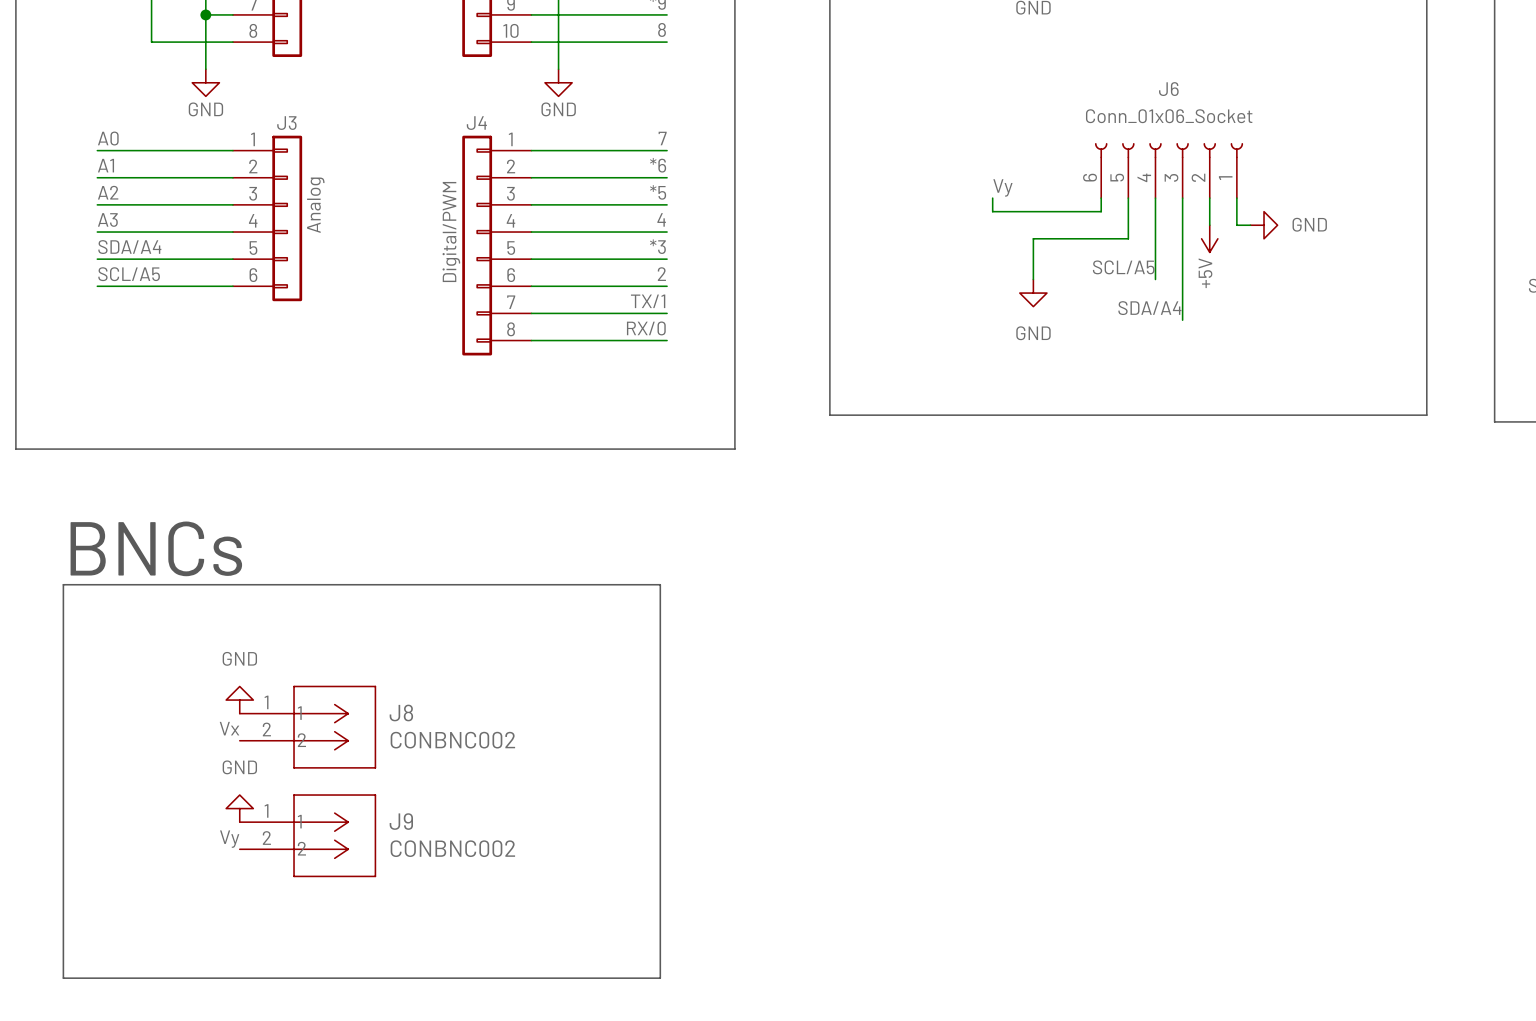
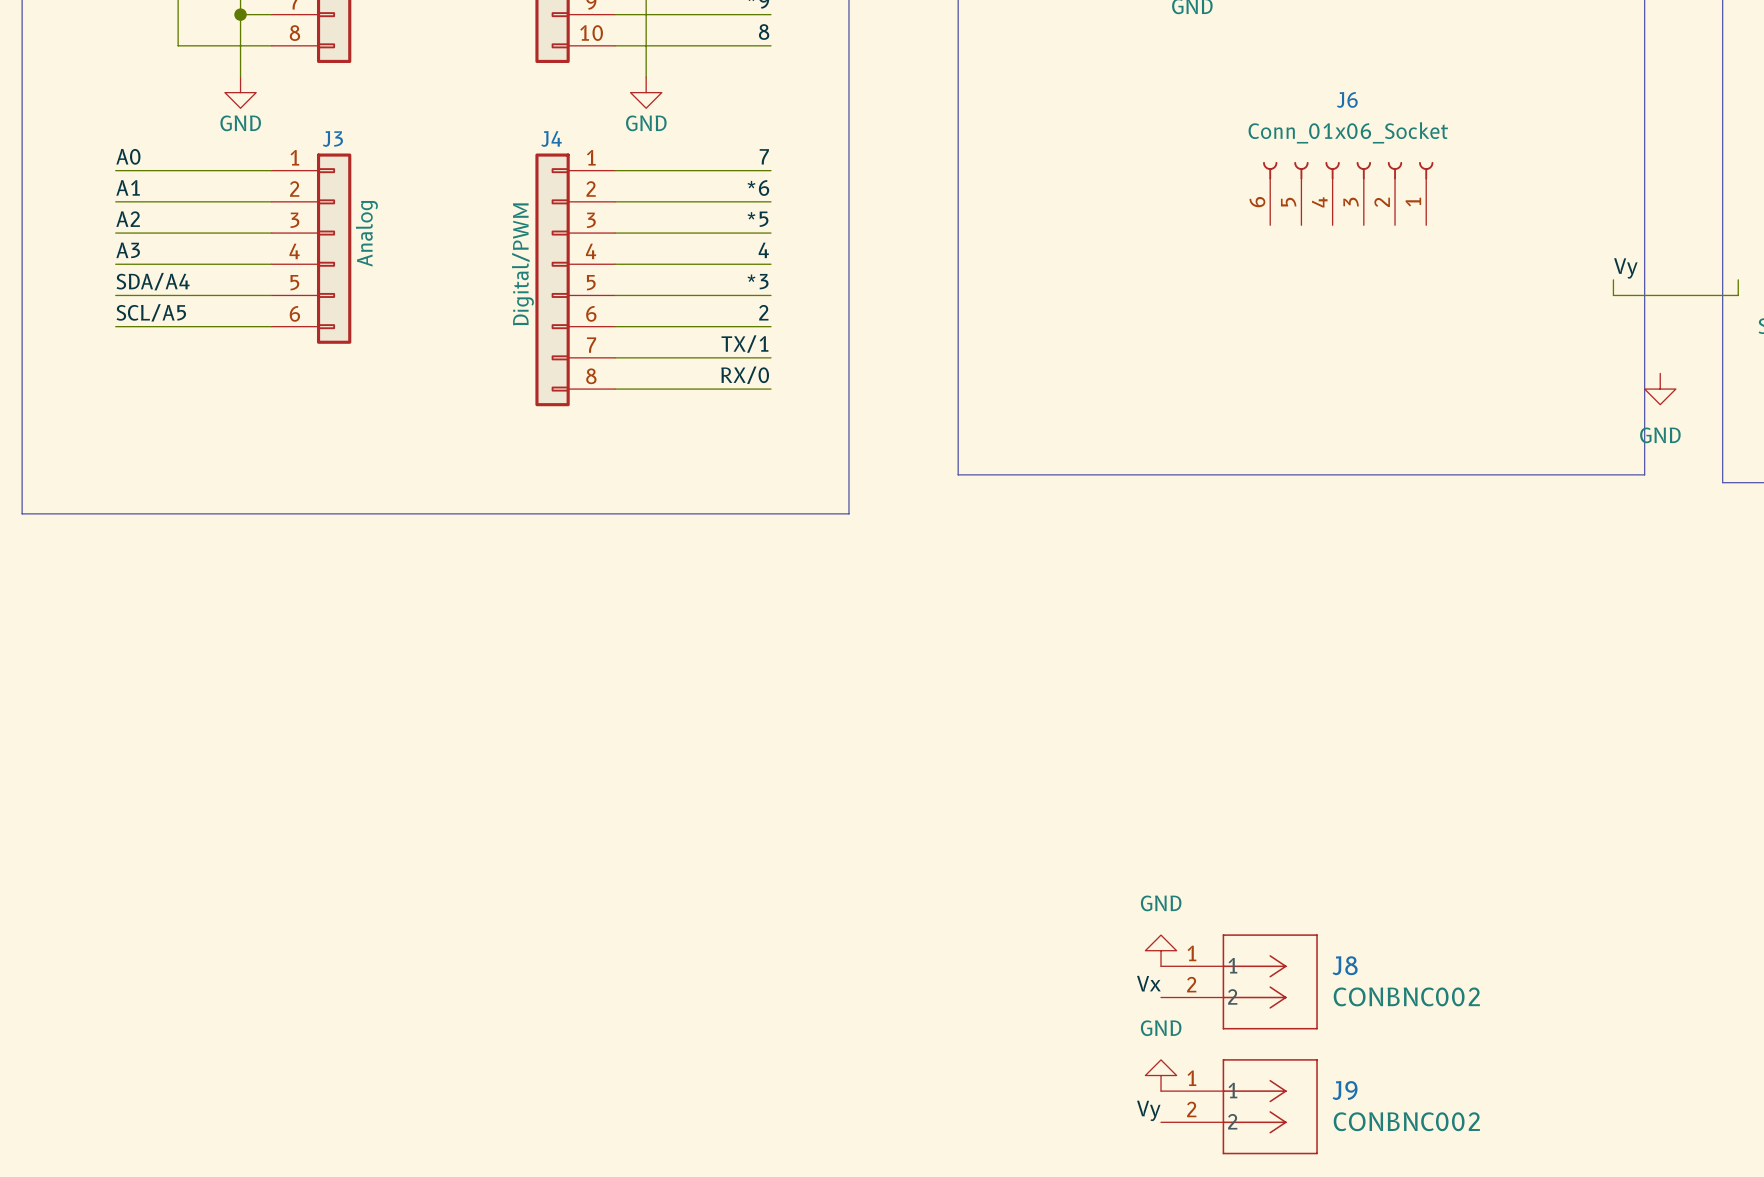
label: Vy (1002, 187) -> none
wire: (992, 198) (992, 211) (1101, 211) (1101, 198) -> none
wire: (1128, 198) (1128, 238) (1033, 238) (1033, 279) -> none
wire: (1155, 198) (1155, 279) -> none
wire: (1182, 198) (1182, 320) -> none
wire: (1209, 198) (1209, 225) -> none
wire: (1236, 198) (1236, 225) (1250, 225) -> none
power symbol: GND (1264, 225) -> none
label: none -> Vy (1625, 268)
power symbol: +5V (1209, 238) -> none
wire: none -> (1613, 279) (1613, 295) (1738, 295) (1738, 279)
label: SCL/A5 (1123, 267) -> none
power symbol: GND (1033, 293) -> none
label: SDA/A4 (1149, 308) -> none
power symbol: none -> GND (1660, 389)
text: BNCs (156, 548) -> none
line: (63, 584) (660, 584) (660, 978) (63, 978) (63, 584) -> none
power symbol: GND (239, 700) -> none
J8 position: (307, 727) -> (1239, 981)
label: Vx (229, 728) -> none
power symbol: GND (239, 808) -> none
power symbol: none -> GND (1161, 950)
J9 position: (307, 835) -> (1239, 1106)
label: Vy (229, 839) -> none
label: none -> Vx (1148, 983)
power symbol: none -> GND (1161, 1075)
label: none -> Vy (1148, 1110)

